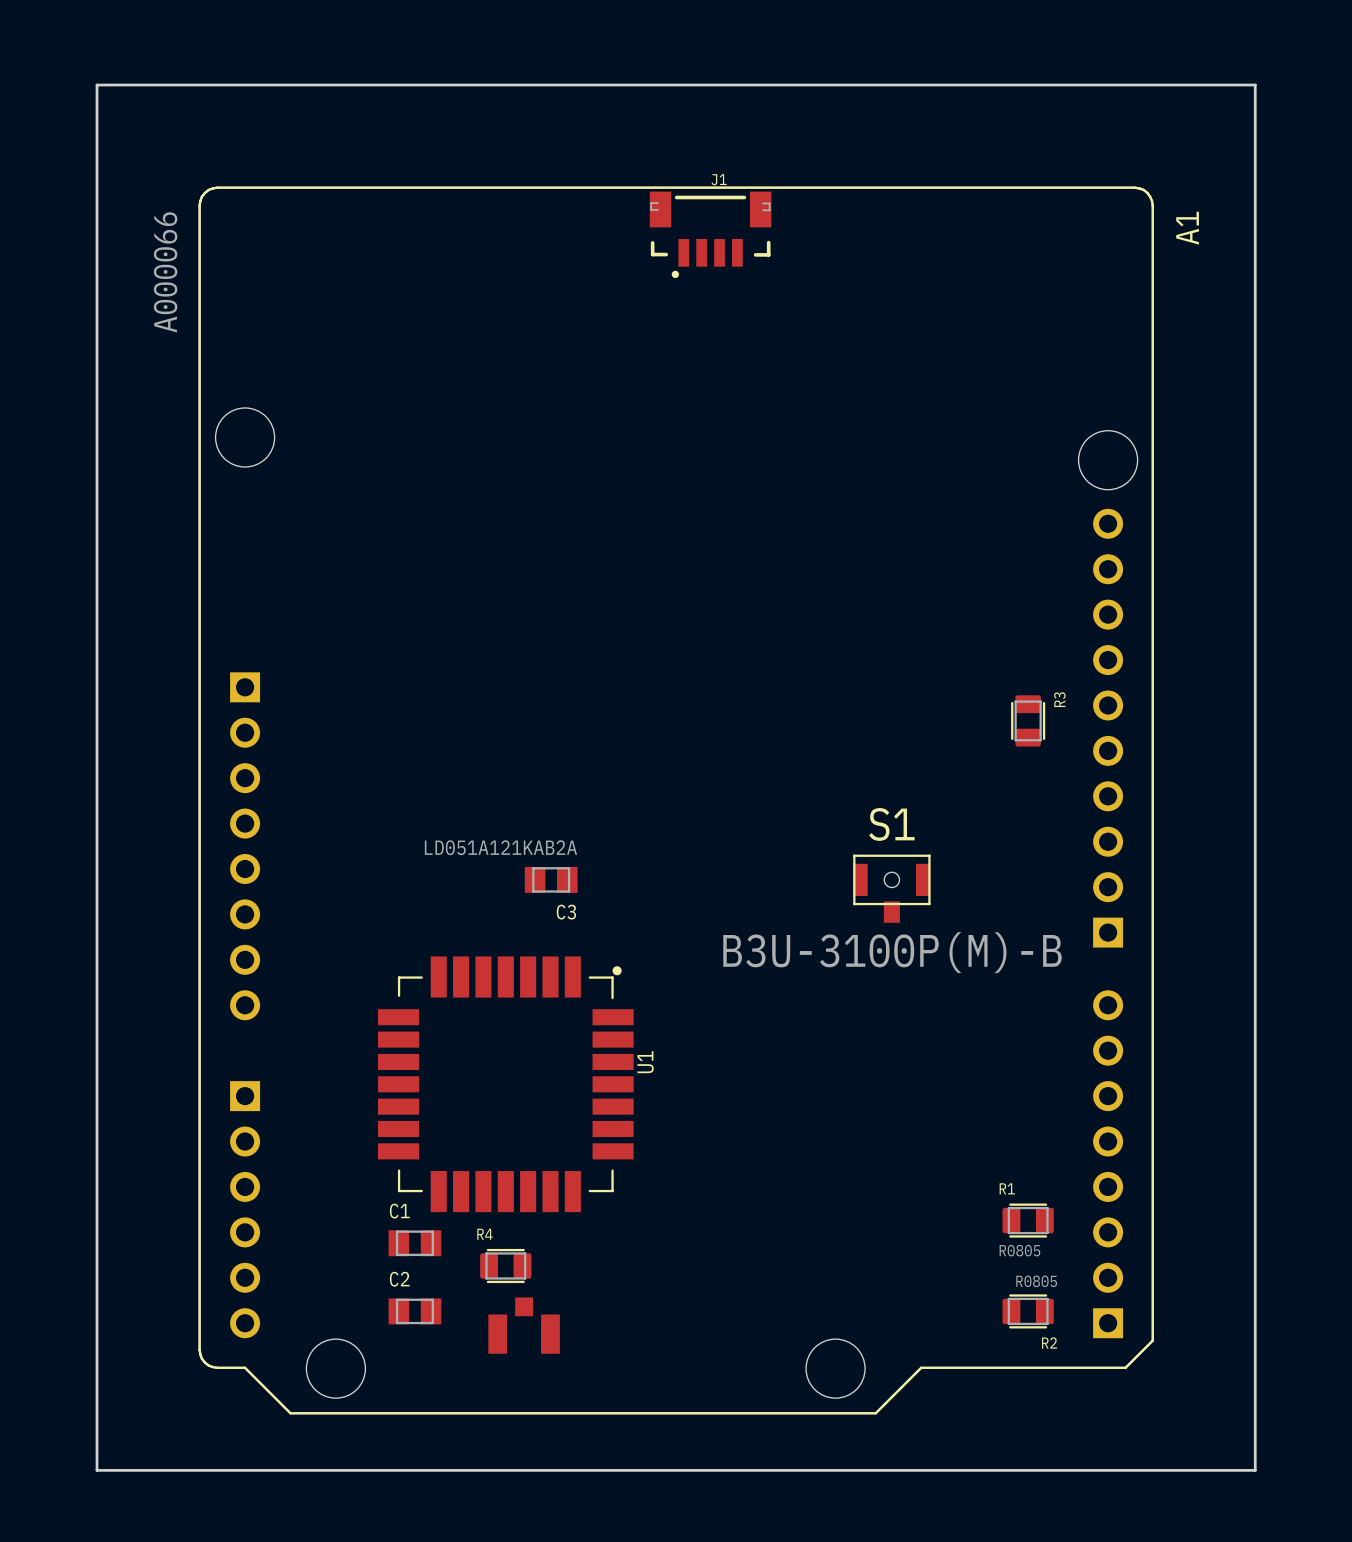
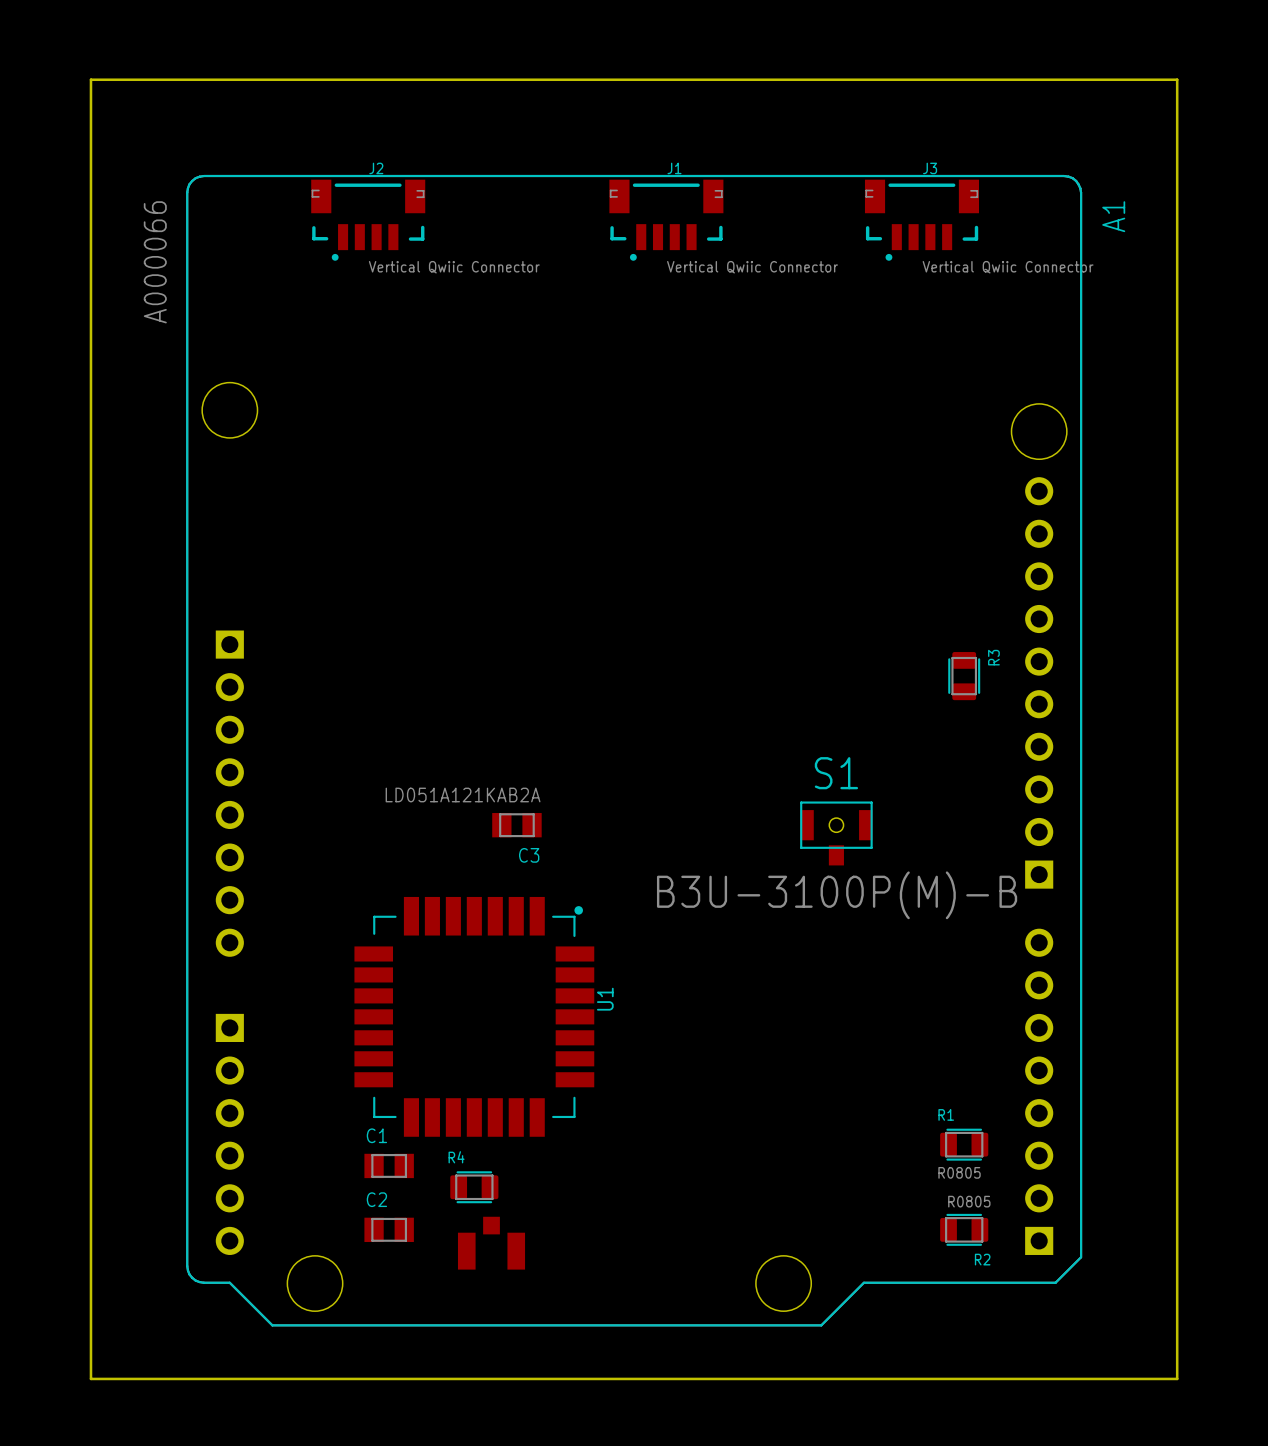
J2: none -> Vertical Qwiic Connector (368, 220)
J3: none -> Vertical Qwiic Connector (921, 220)
J1 value: none -> Vertical Qwiic Connector (752, 267)

